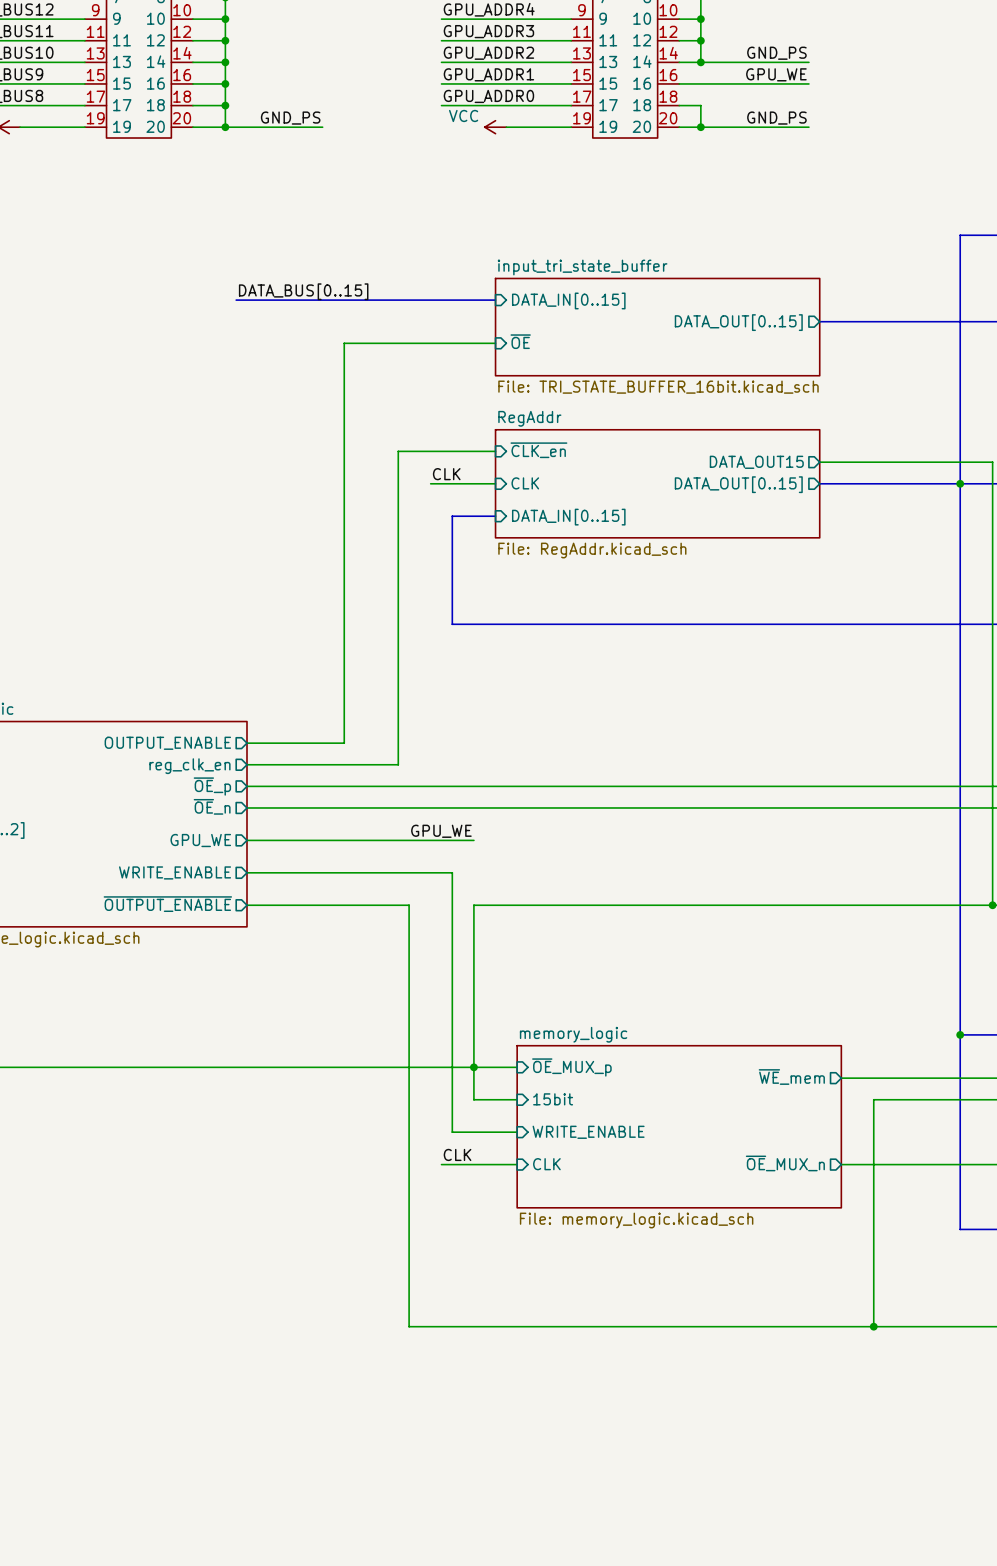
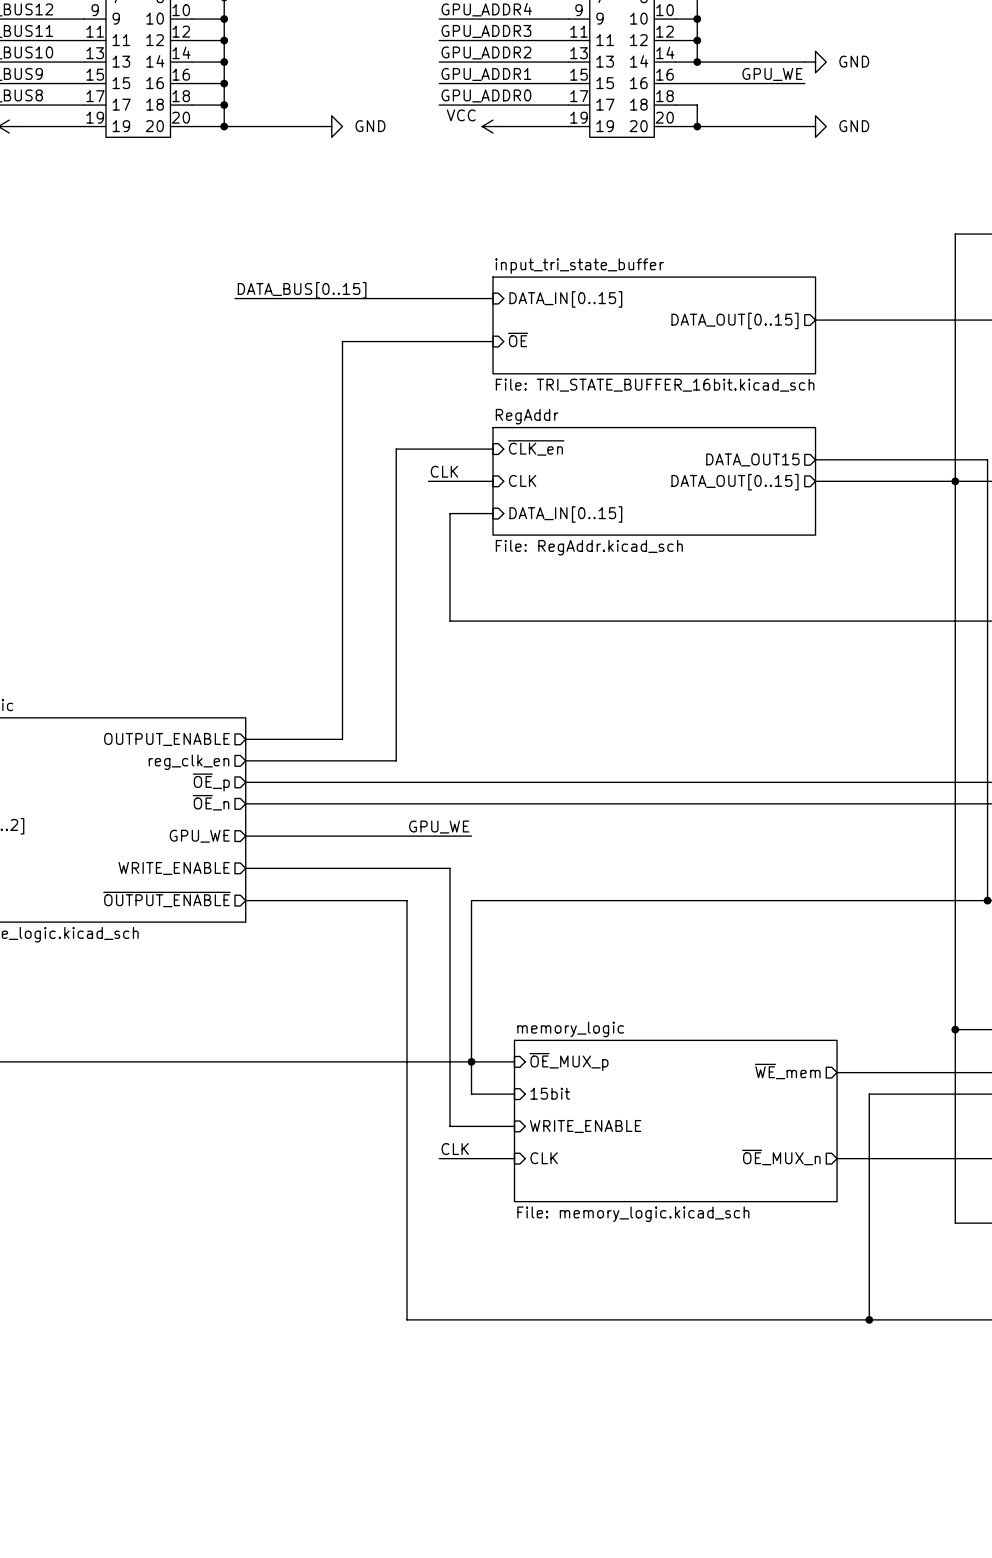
label: GND_PS (776, 53) -> none
power symbol: none -> GND (815, 62)
label: GND_PS (290, 118) -> none
label: GND_PS (776, 118) -> none
power symbol: none -> GND (331, 126)
power symbol: none -> GND (815, 126)

